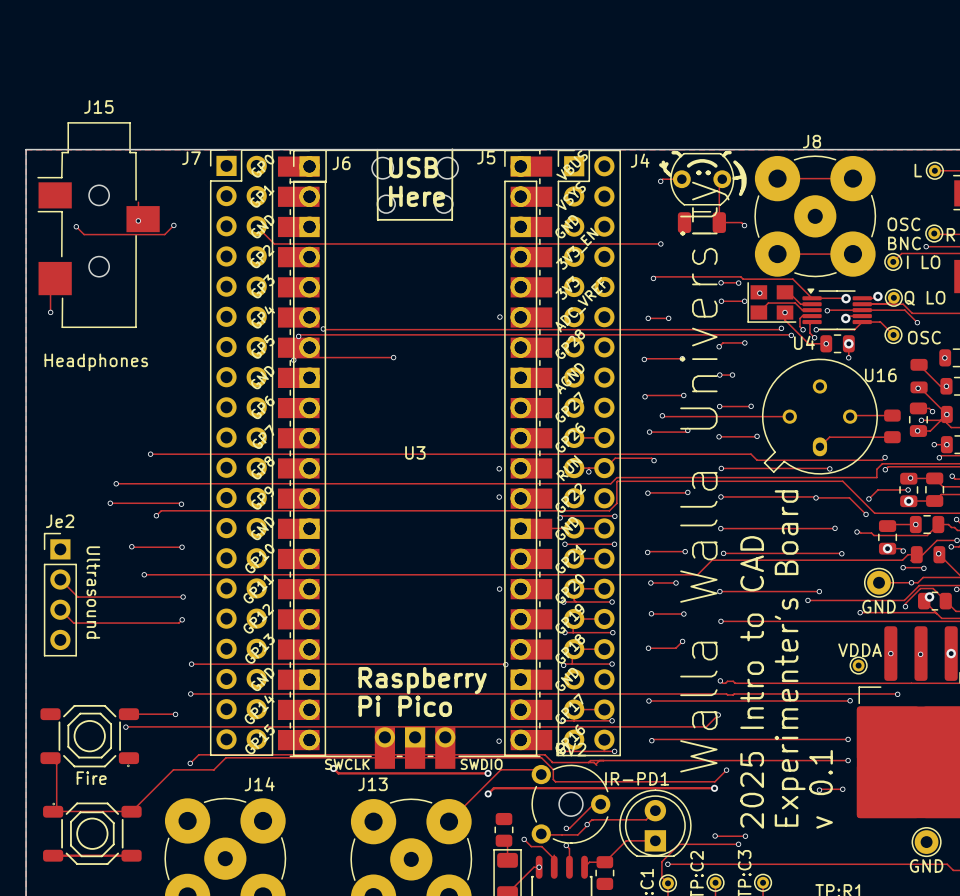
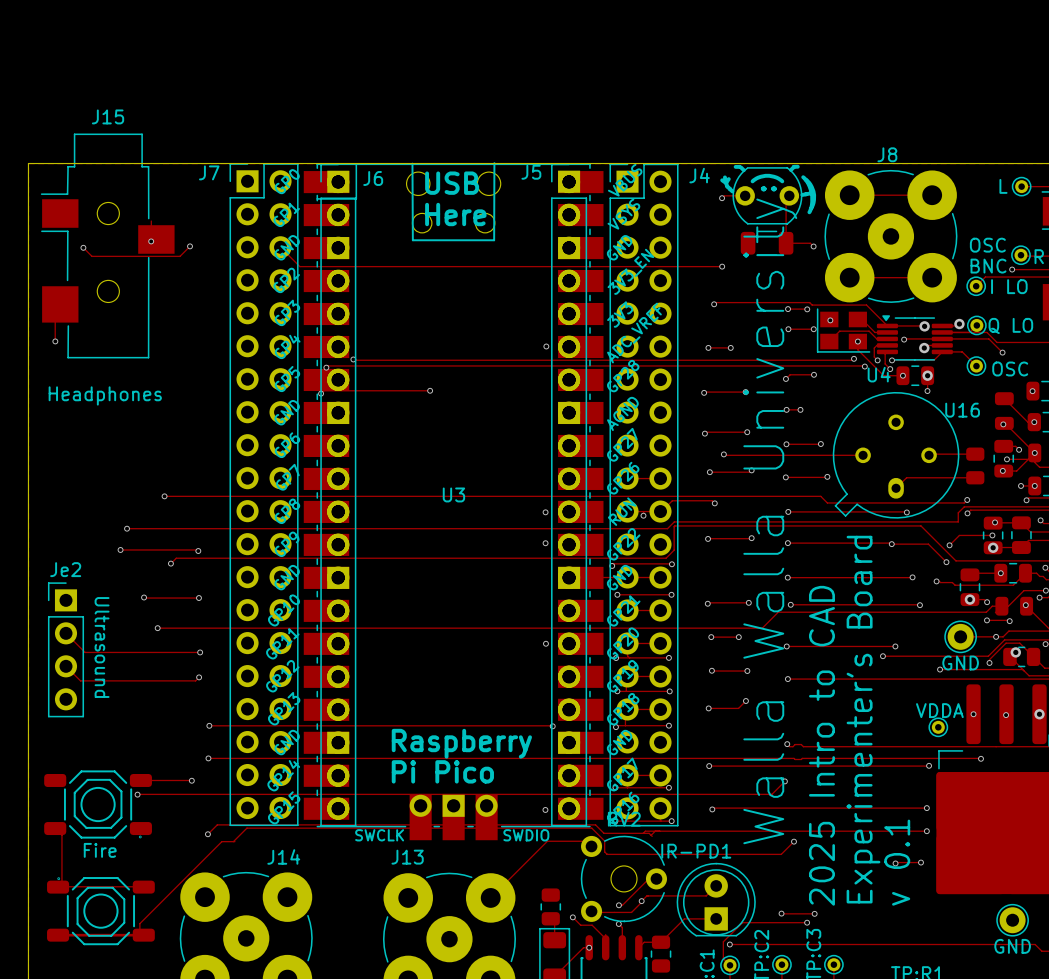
track: (333, 768) (338, 773) (488, 773) -> none
via: (333, 768) -> none
track: (213, 769) (173, 769) (131, 811) -> none
track: none -> (234, 841) (221, 841) (139, 923) (139, 935) (61, 935)
via: (488, 773) -> none
track: (714, 788) (493, 788) (488, 793) -> none
via: (714, 788) -> none
via: (488, 793) -> none

